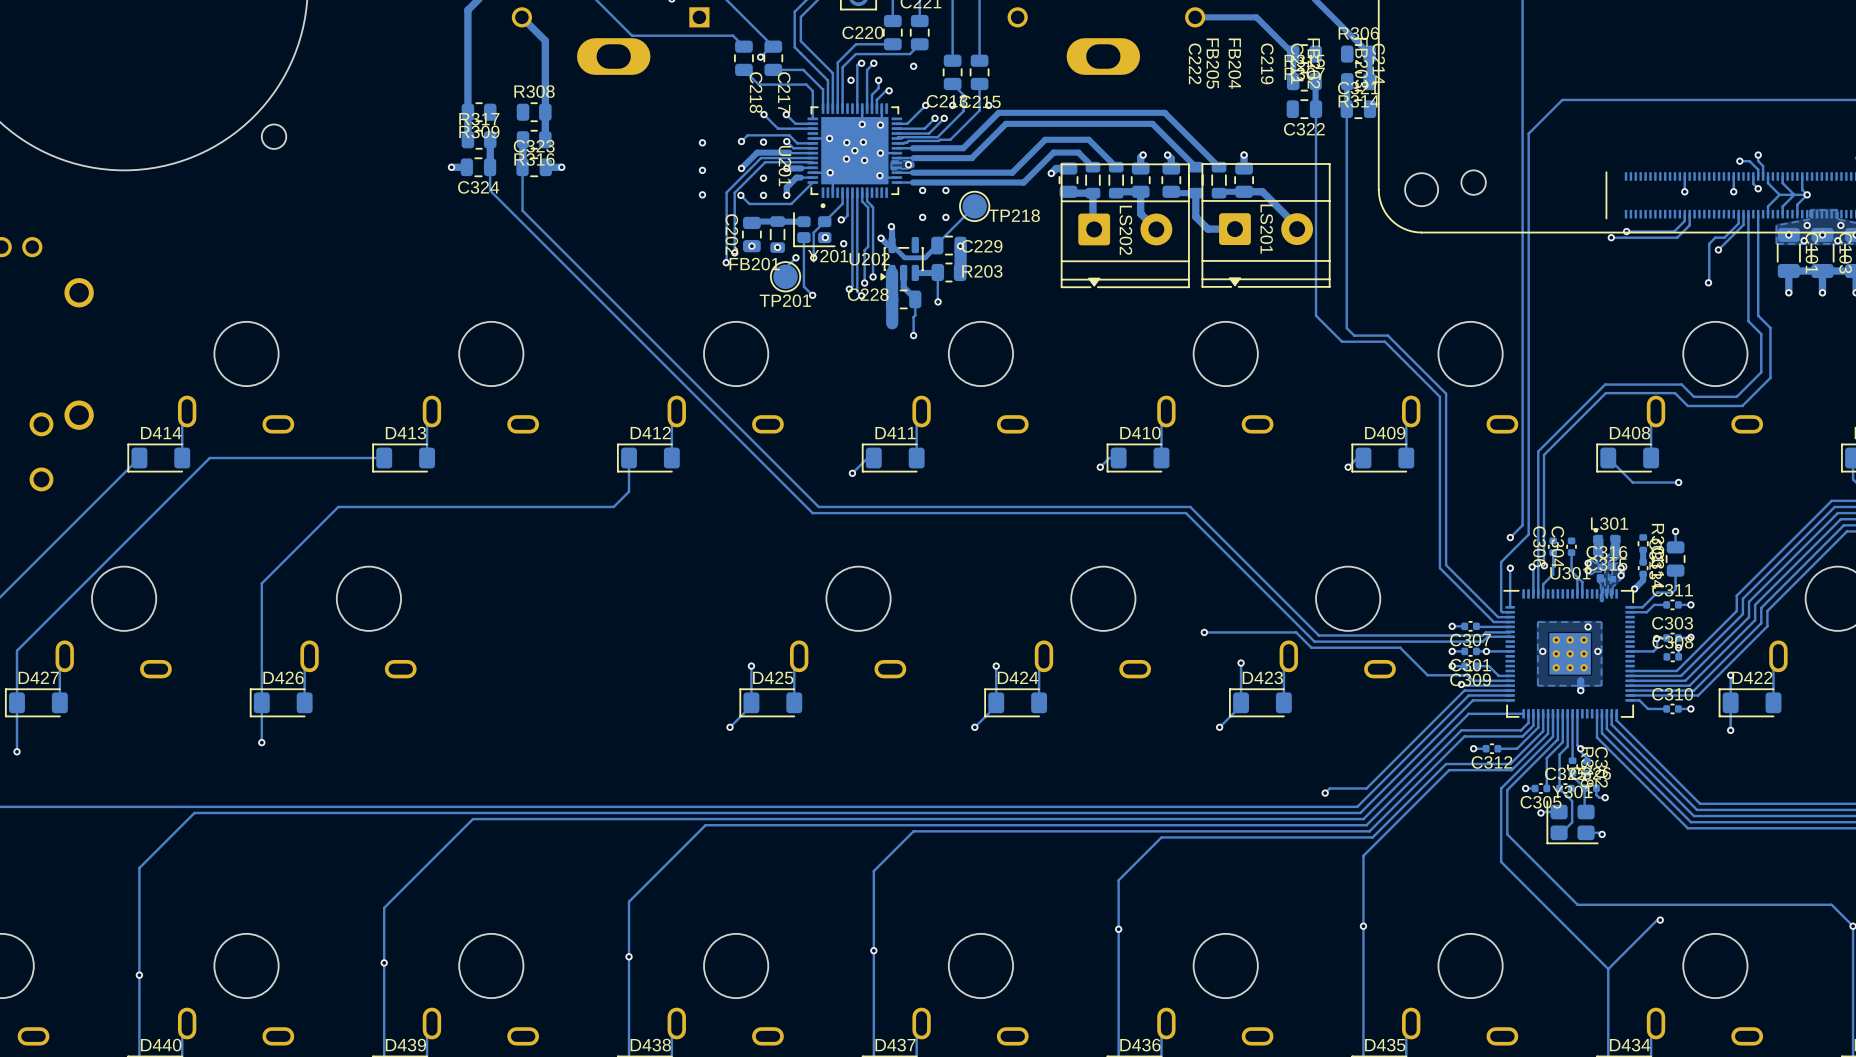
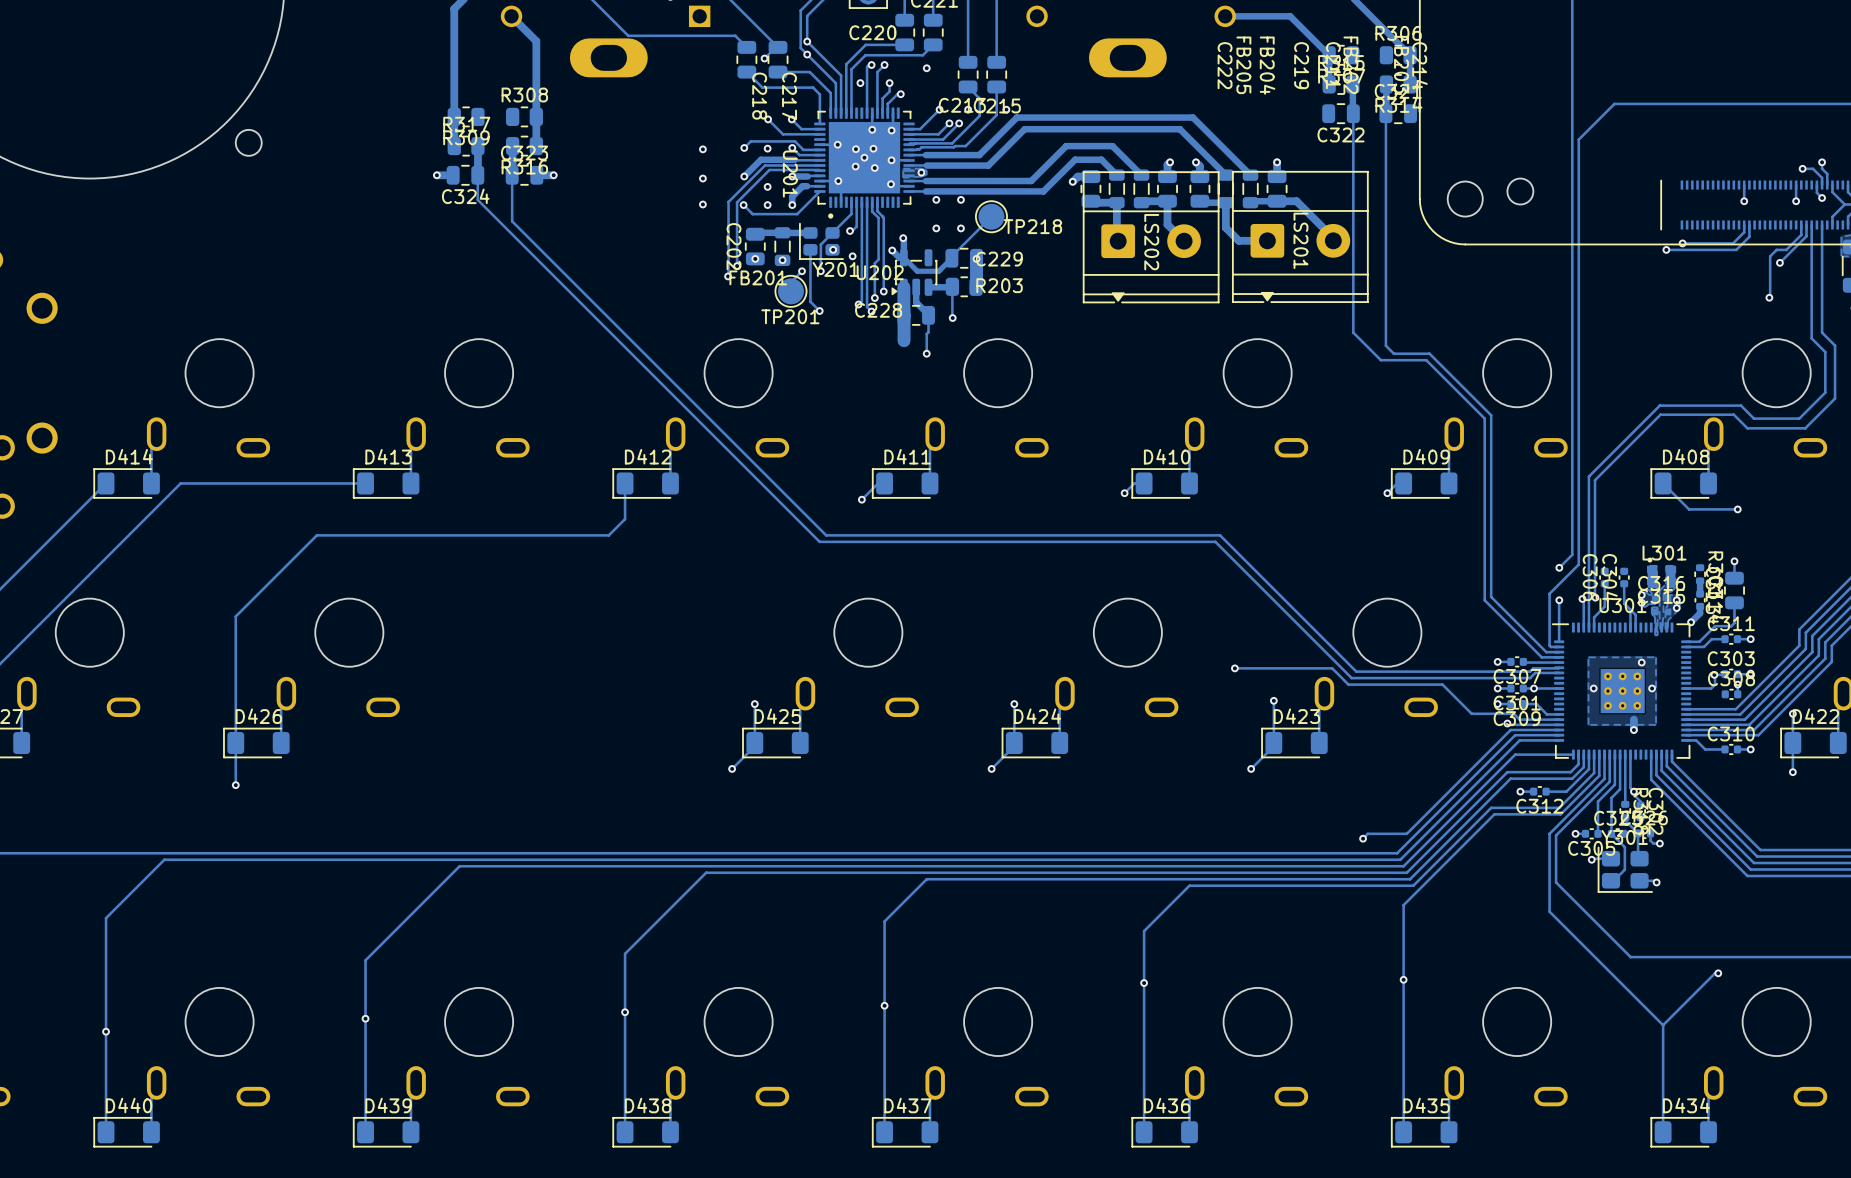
via: none -> (807, 41)
via: none -> (807, 54)

